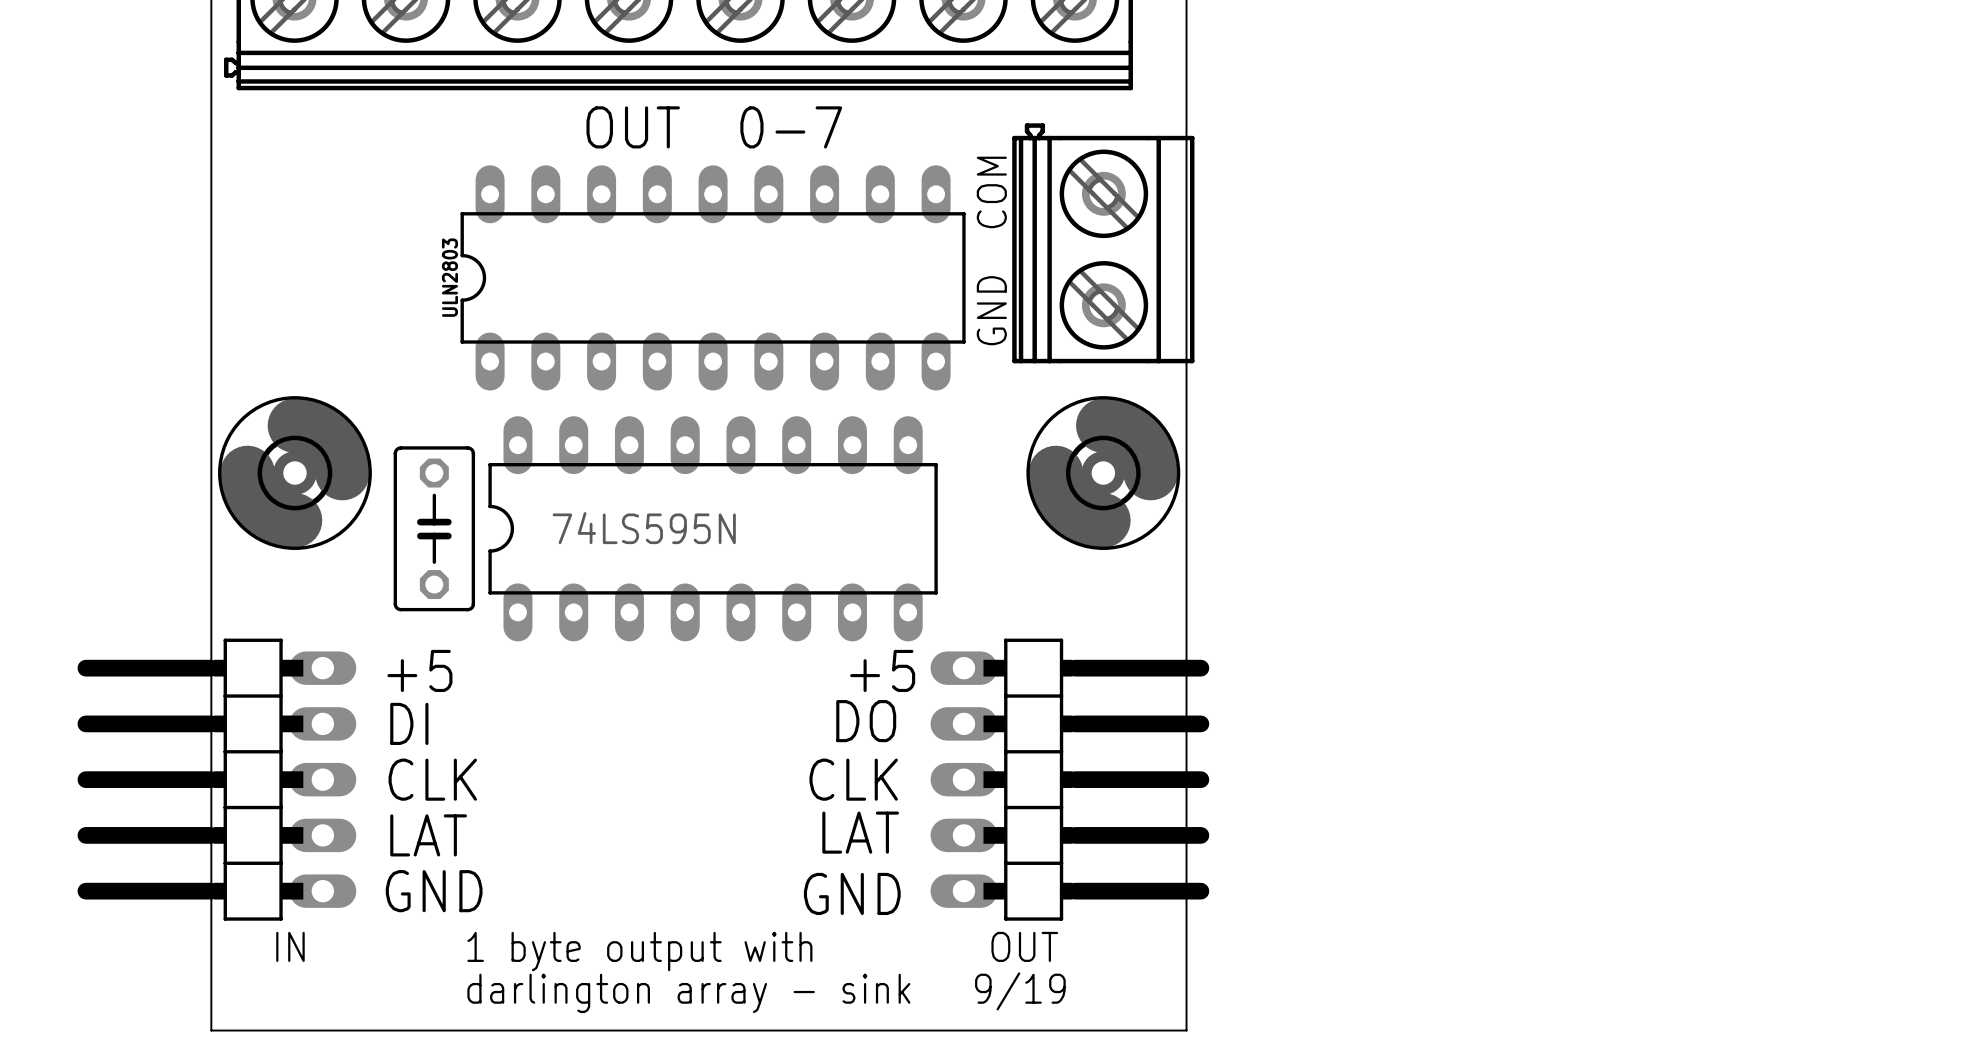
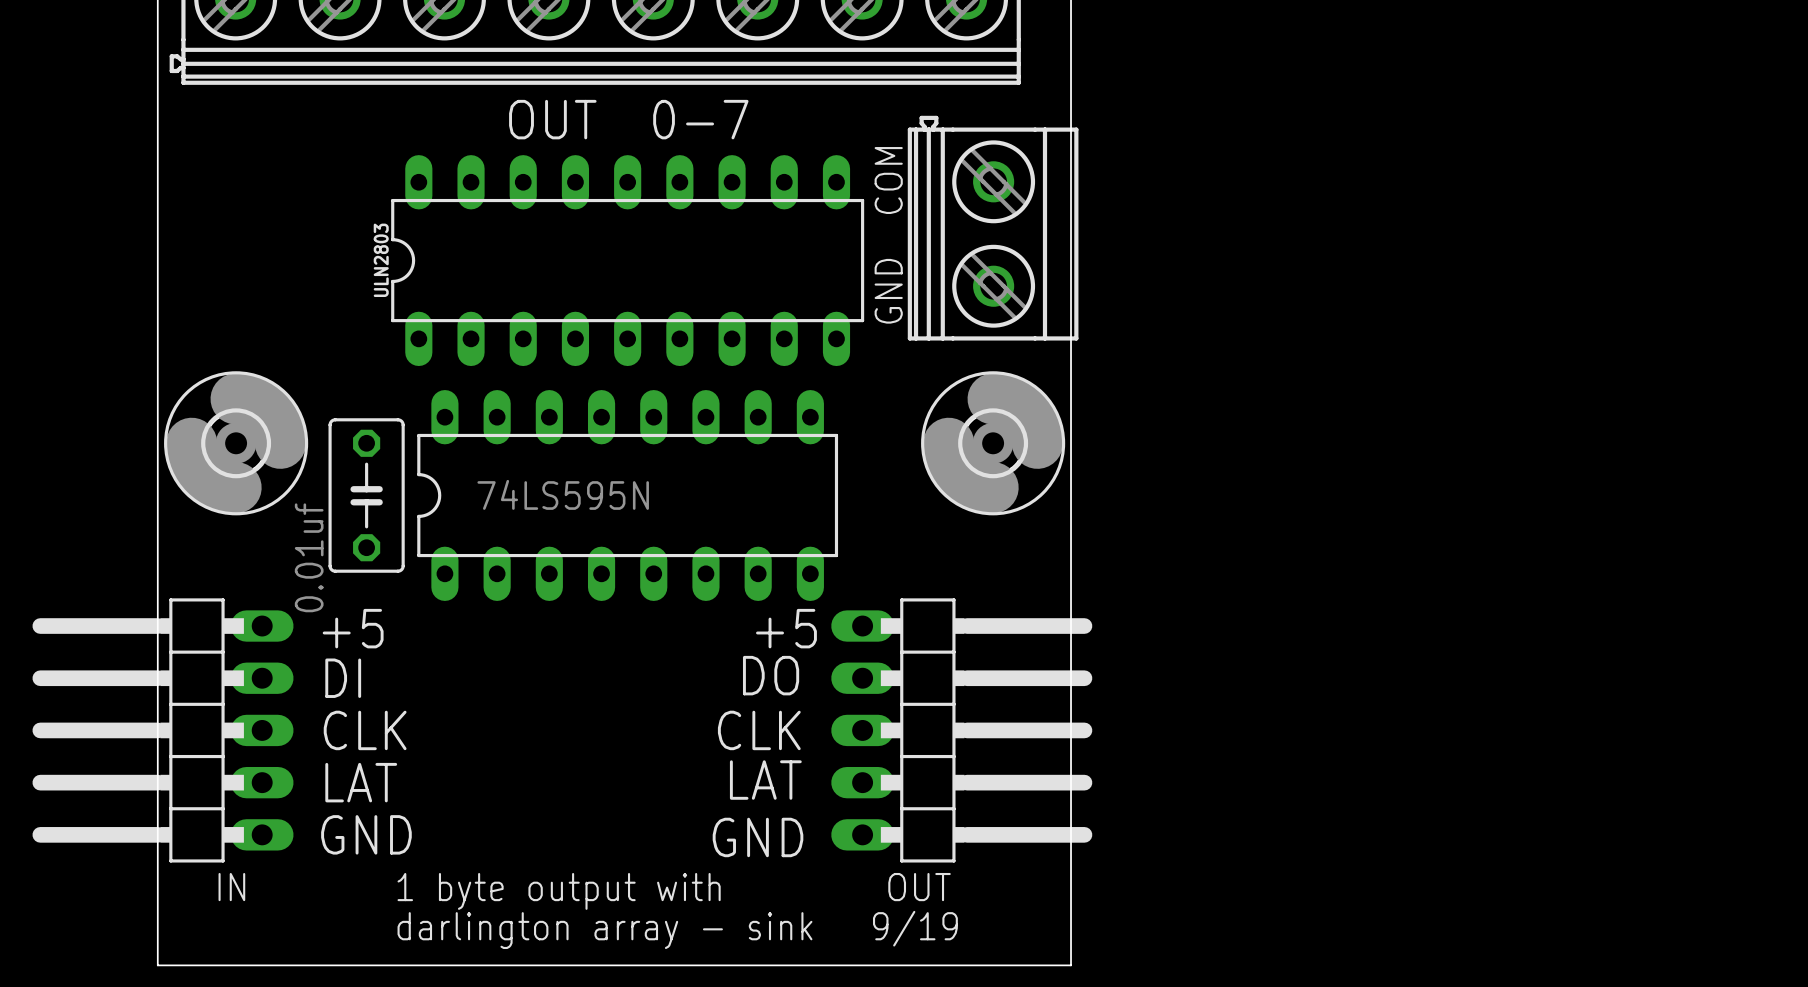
part value: none -> 0.01uf (309, 557)

